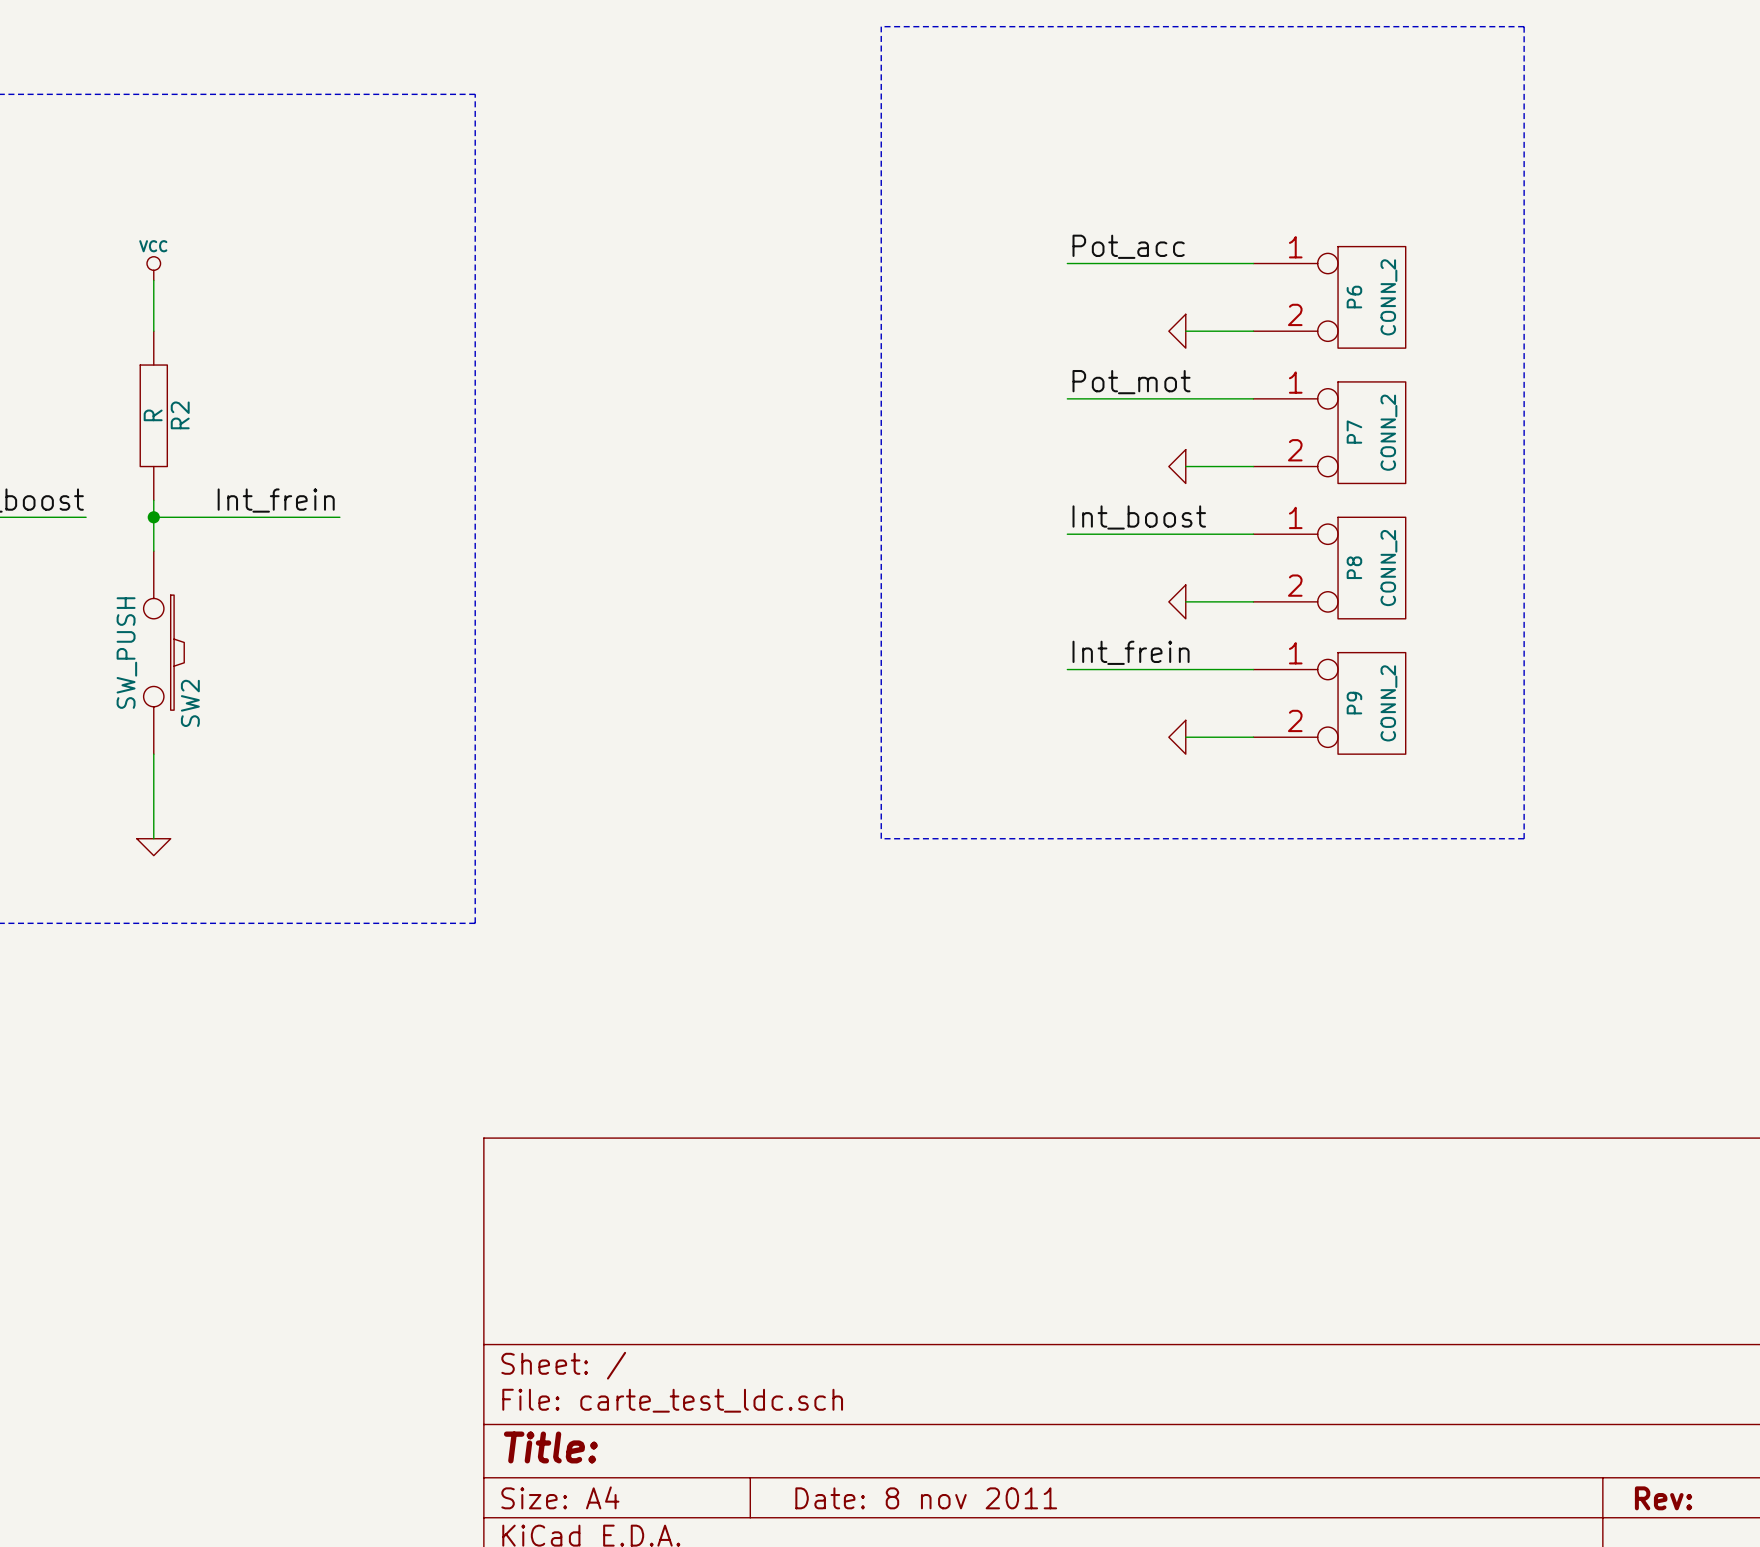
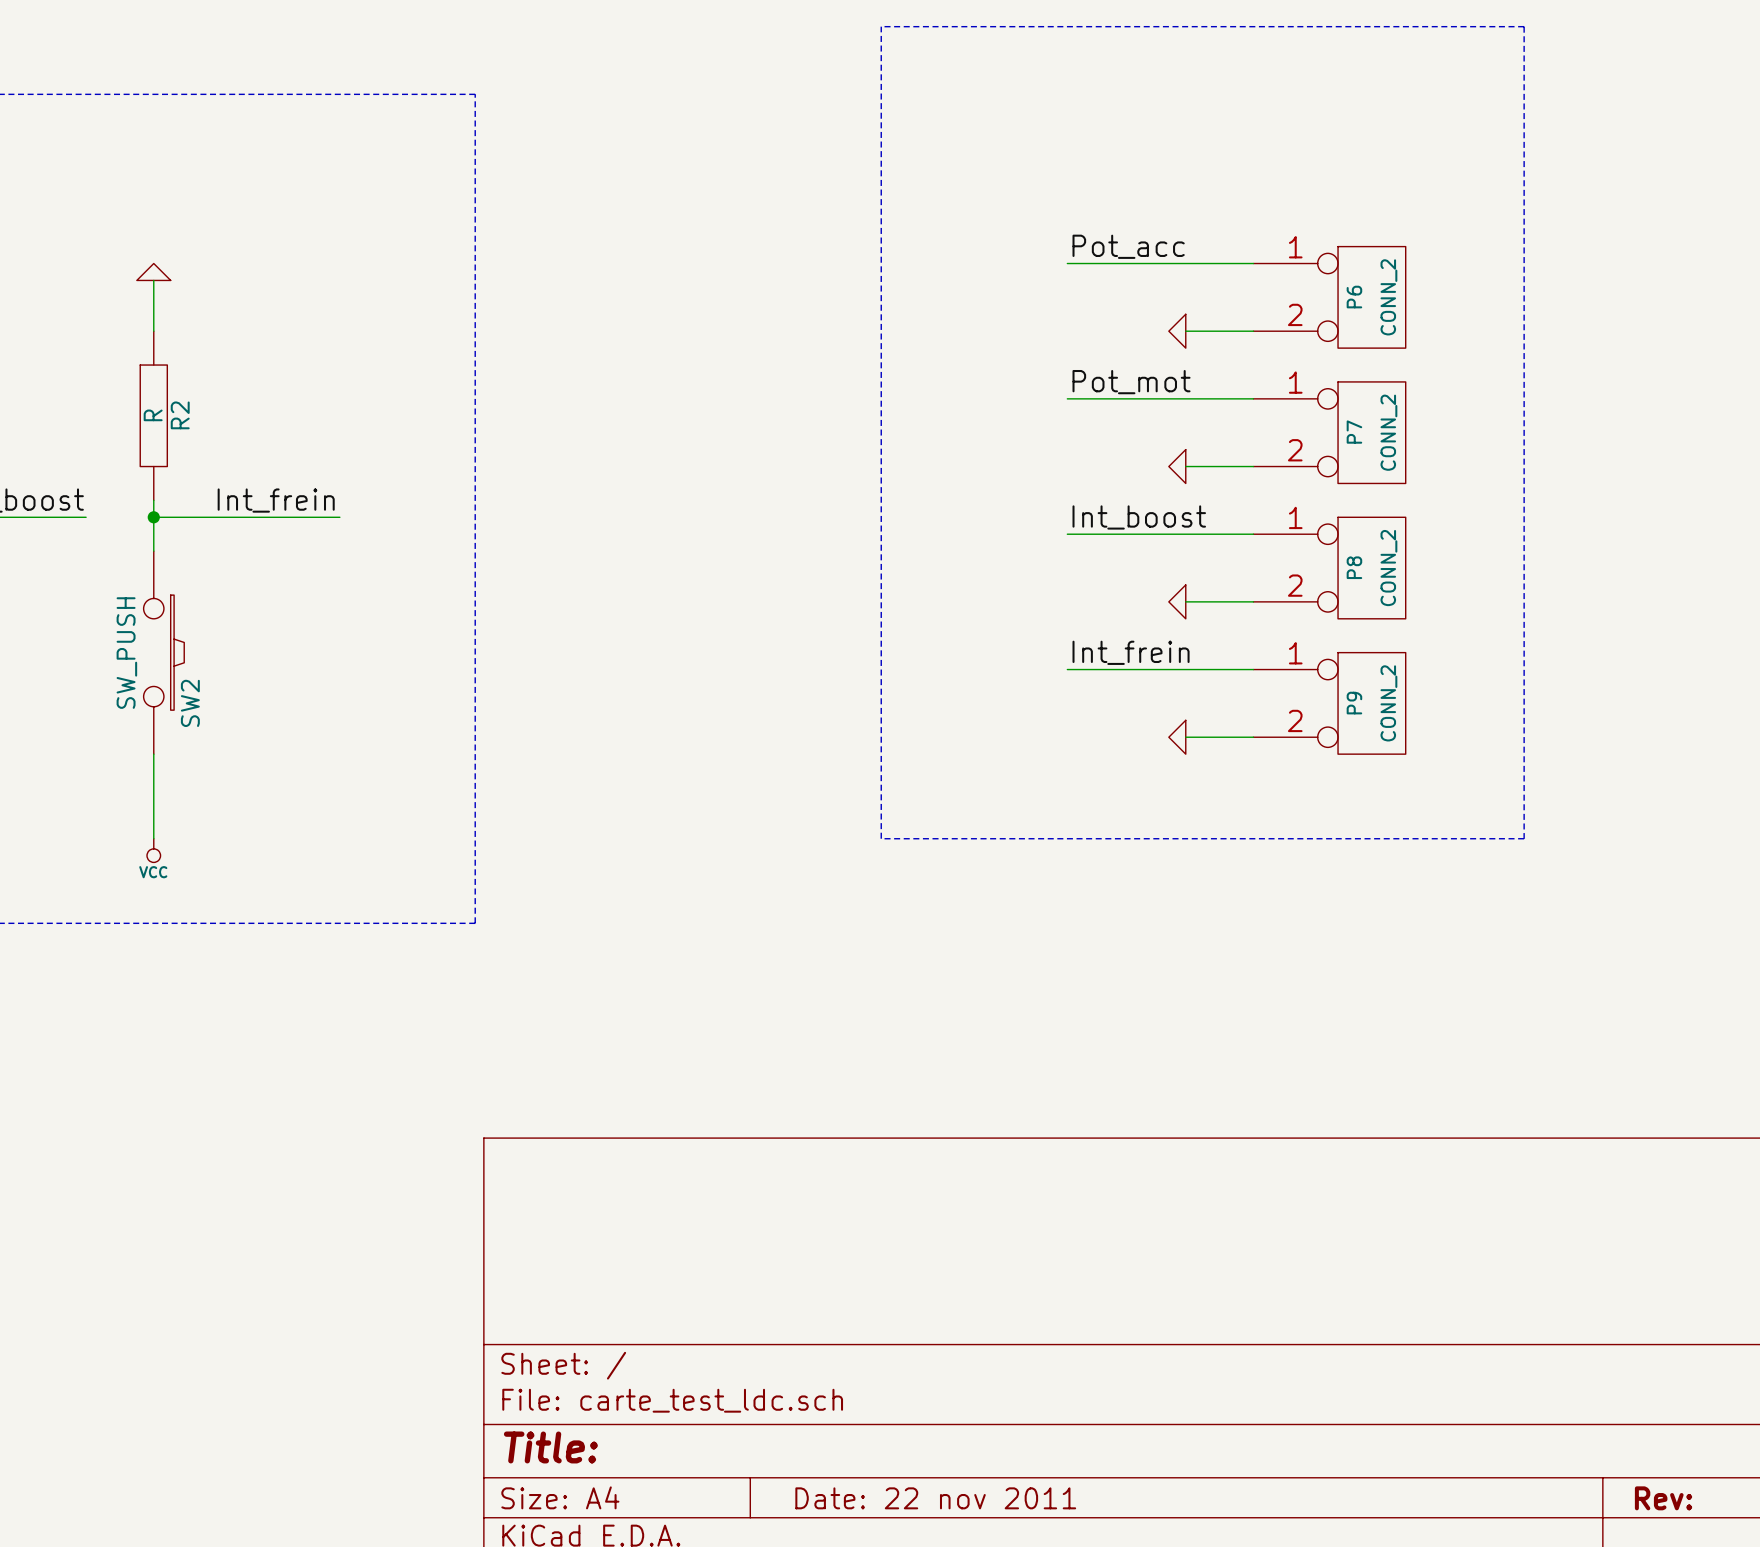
power symbol text: VCC (153, 246) -> none
power symbol shape: [147, 256, 161, 281] -> [136, 263, 171, 281]
power symbol shape: [136, 838, 171, 856] -> [147, 838, 161, 863]
power symbol text: none -> VCC (153, 872)
title block: Date: 8 nov 2011 (926, 1498) -> Date: 22 nov 2011 (935, 1498)

